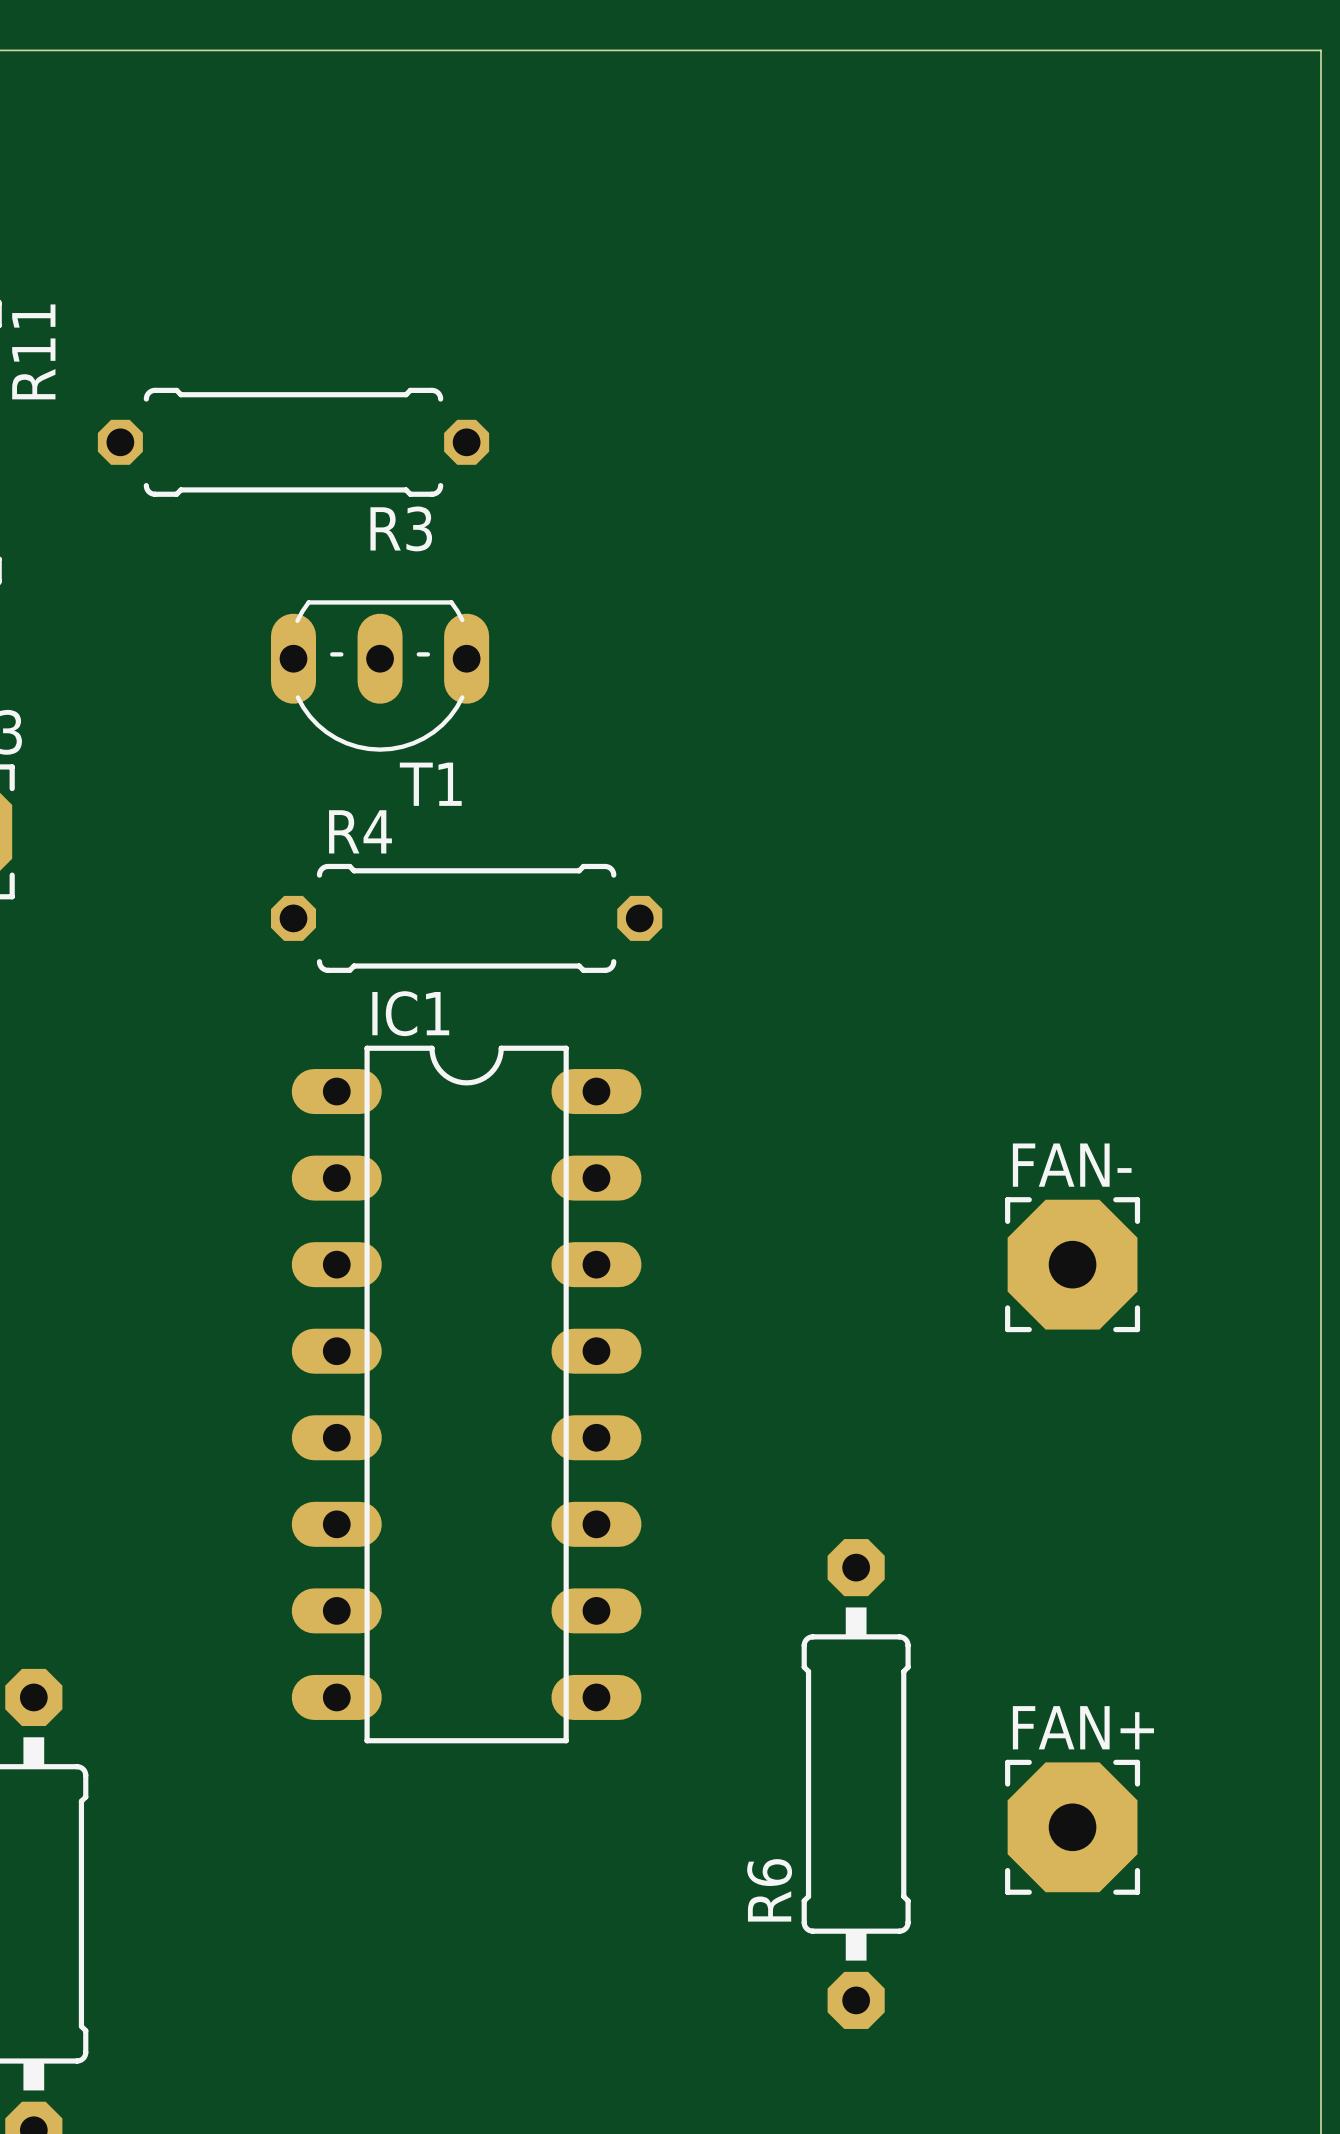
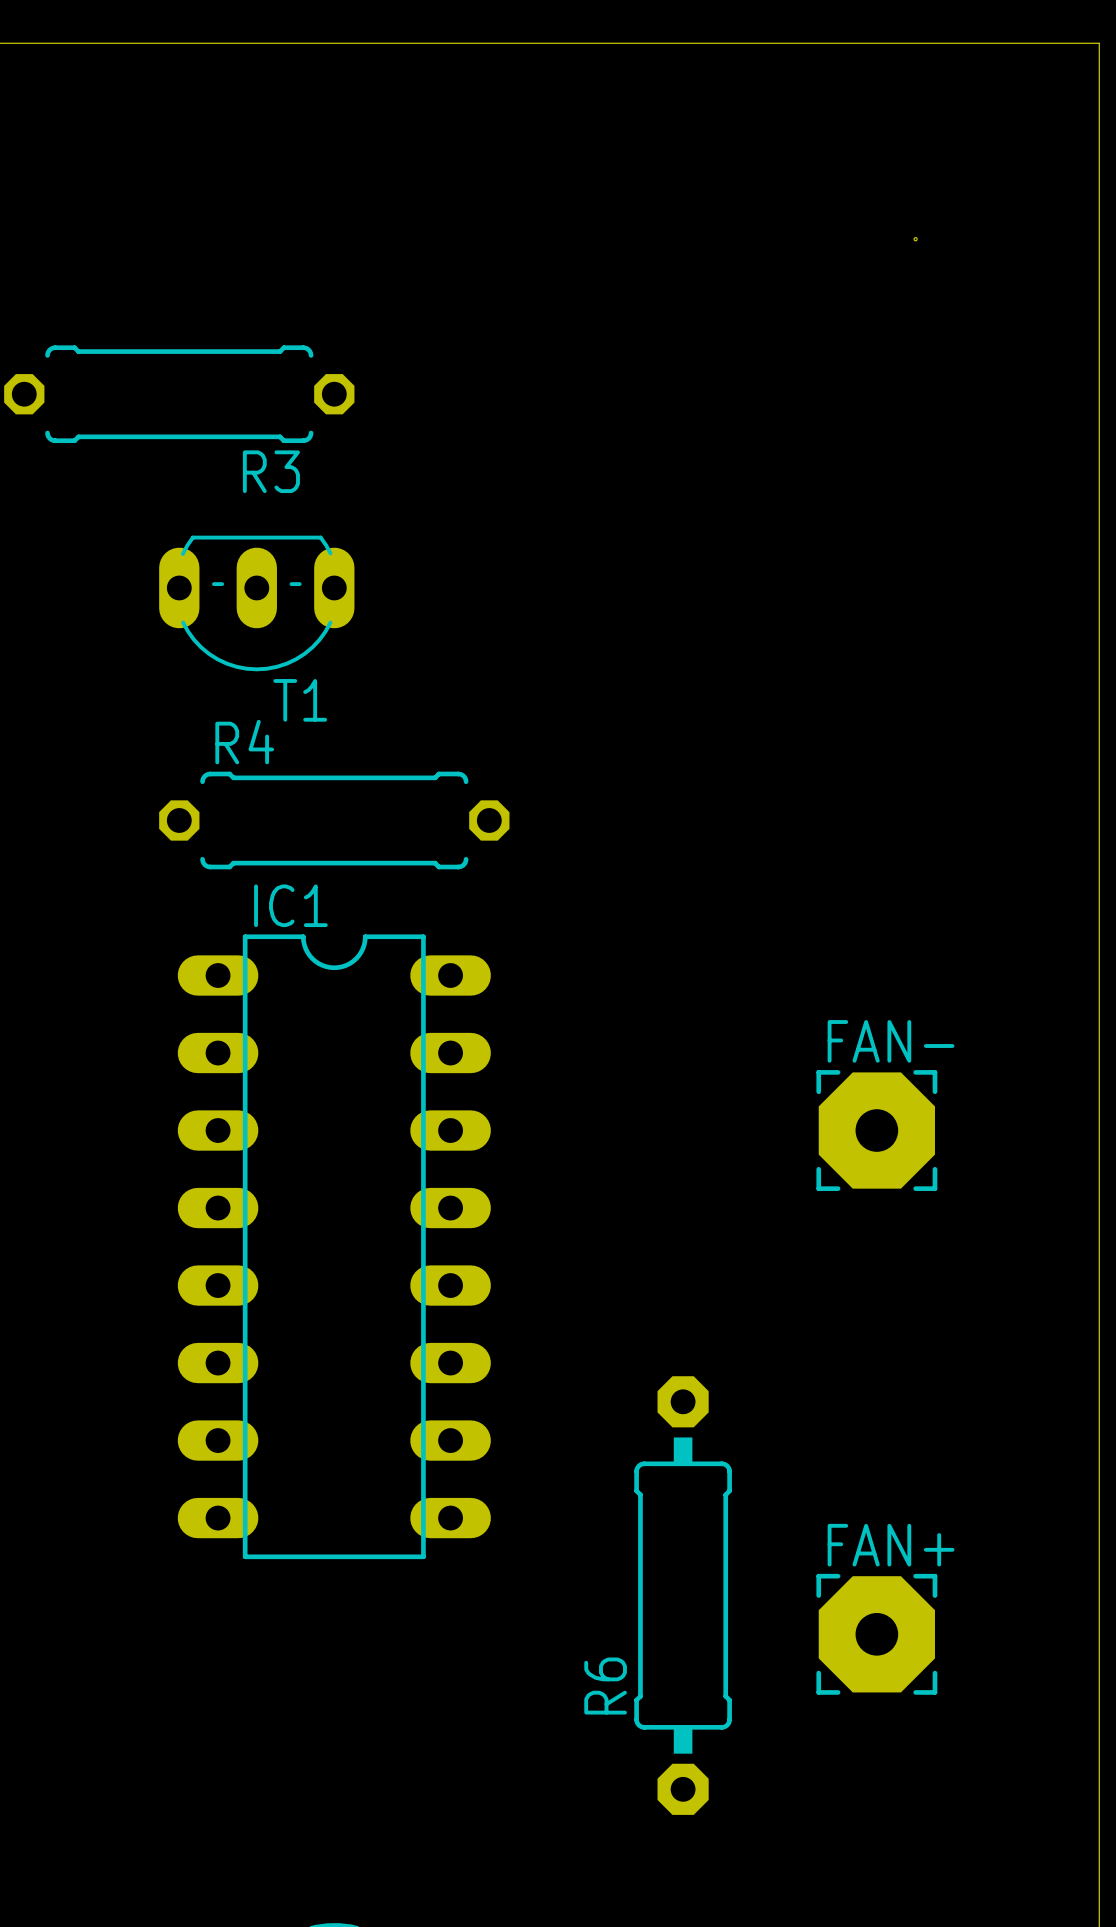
hole: none -> (915, 239)

